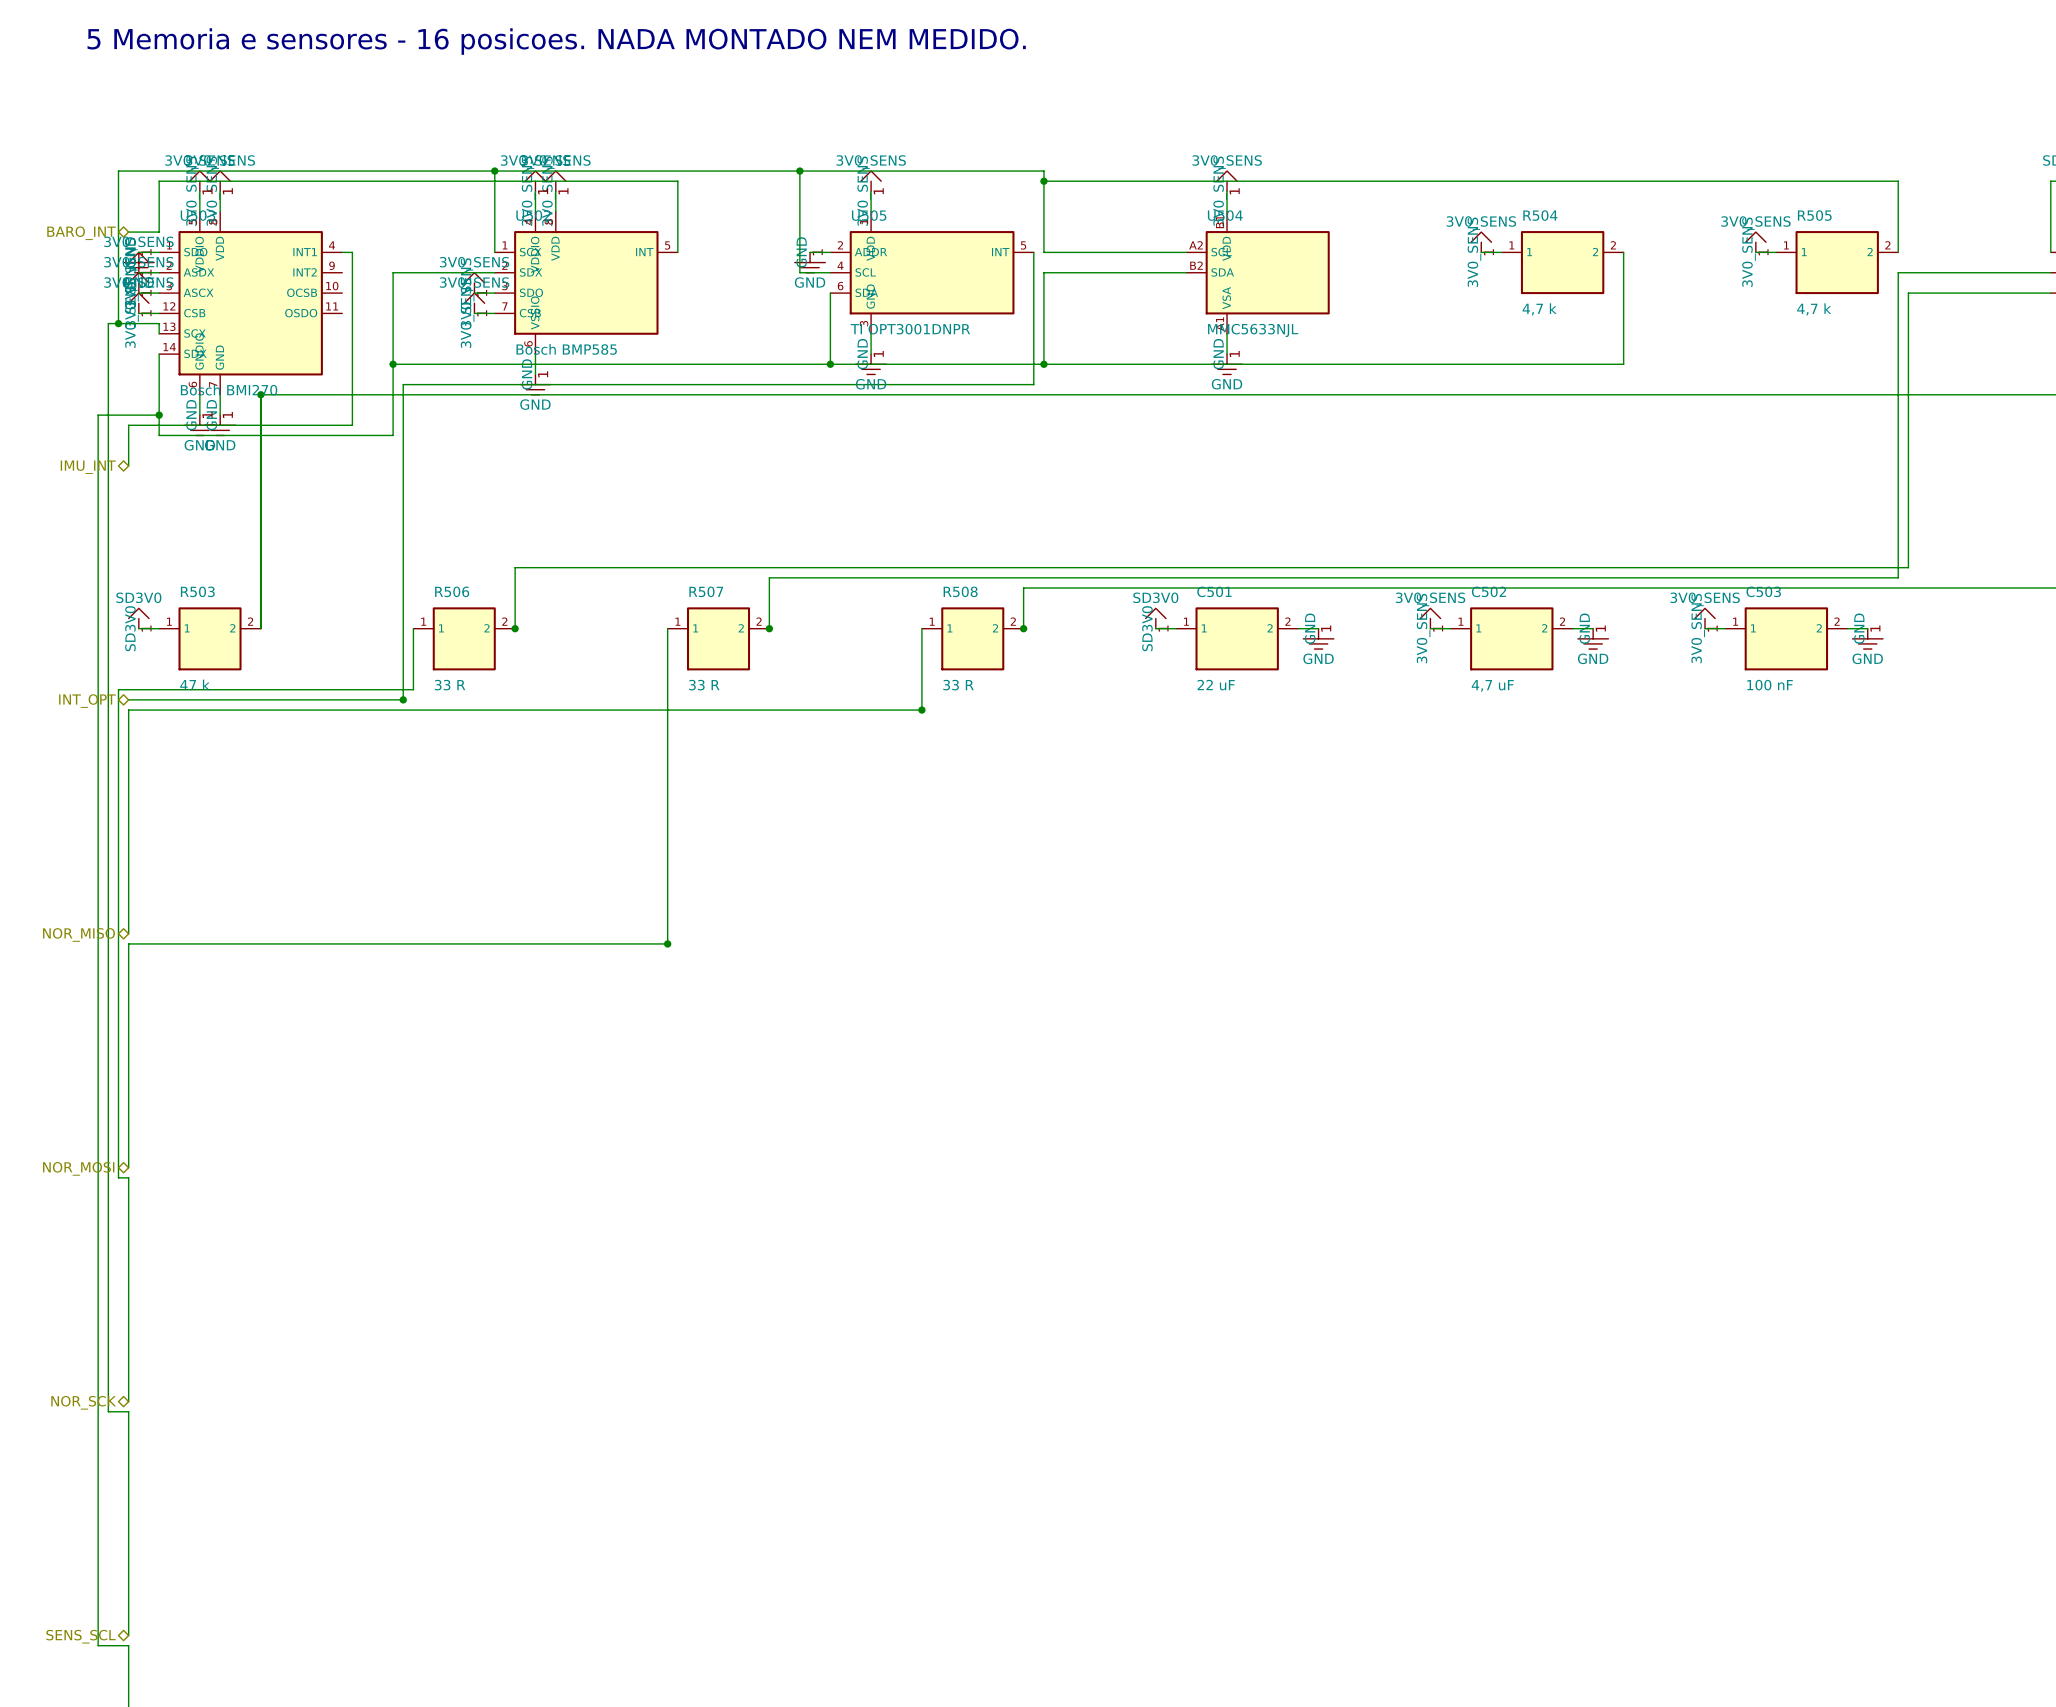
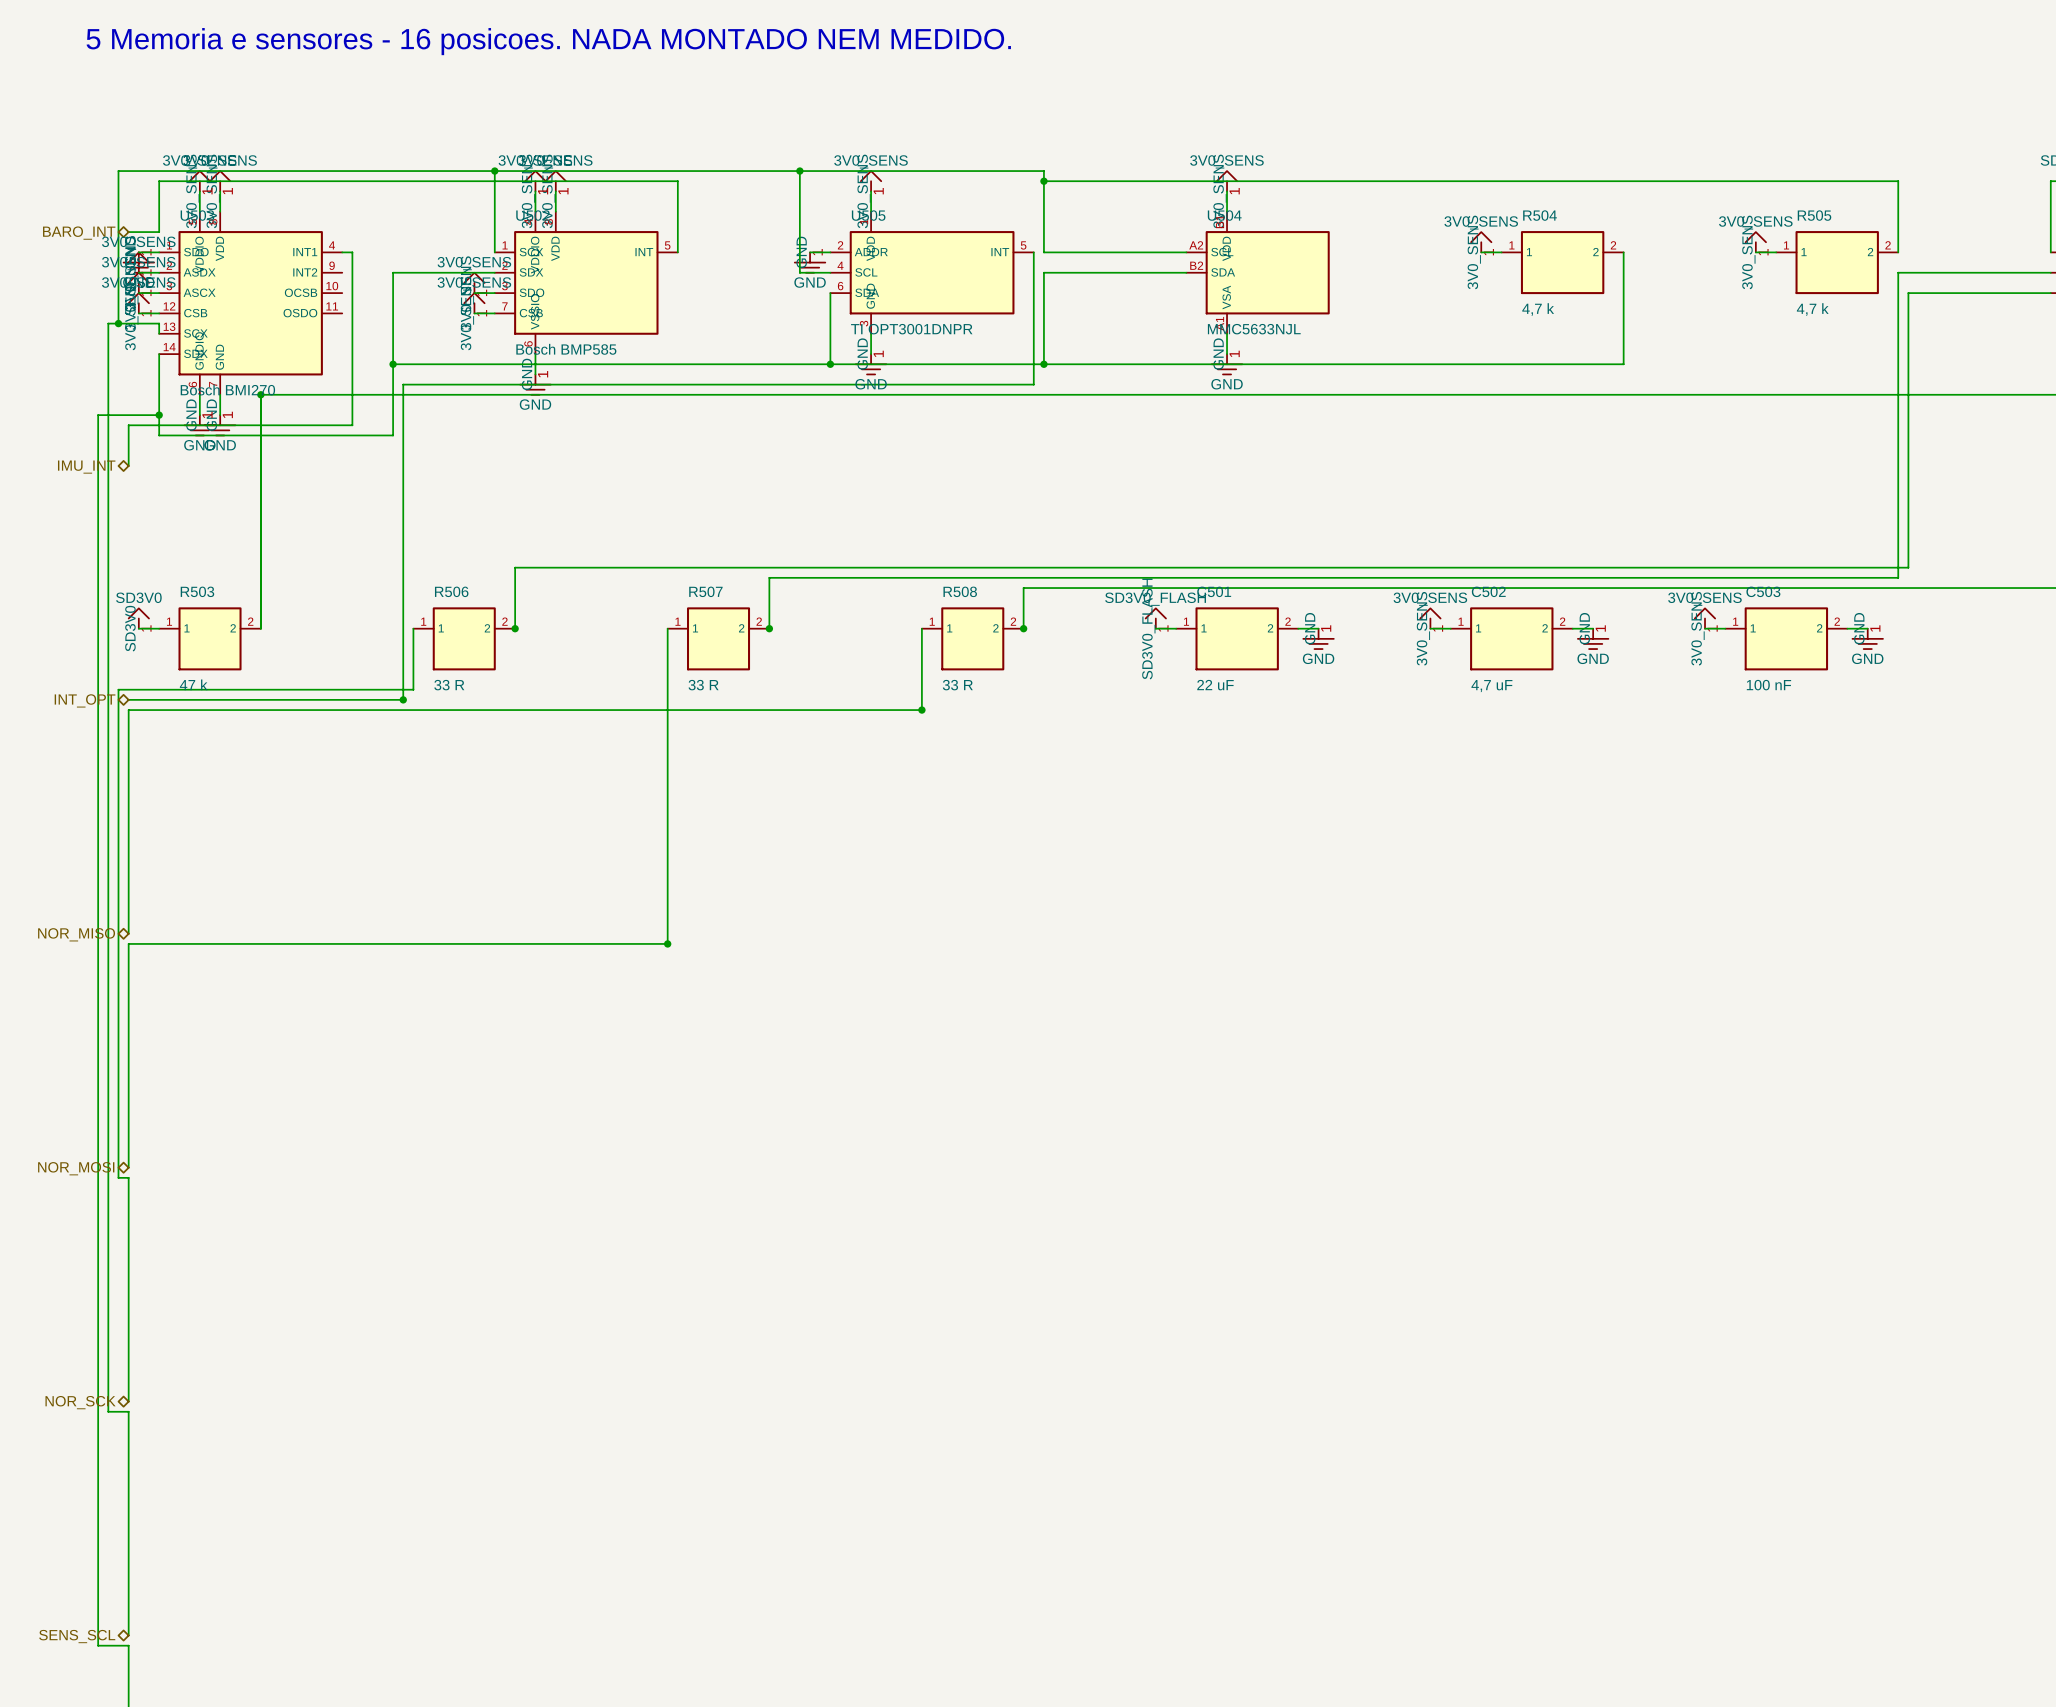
power symbol: SD3V0 (1155, 618) -> SD3V0_FLASH (1155, 618)

